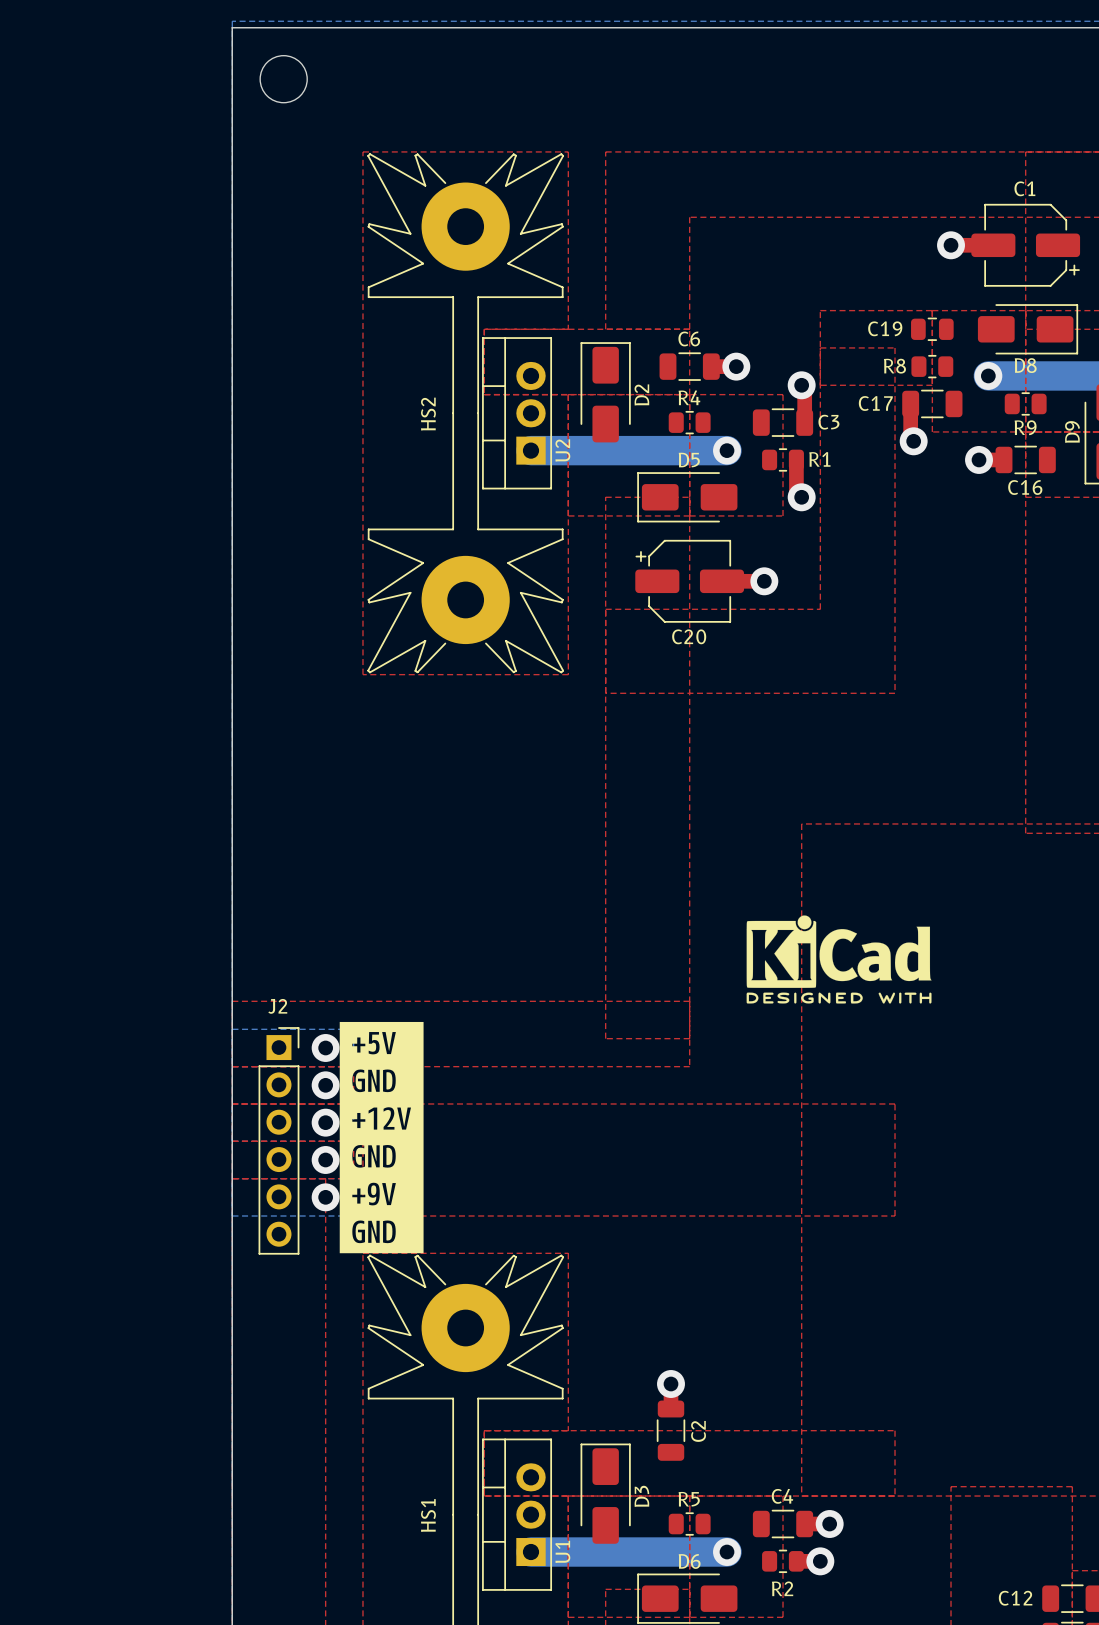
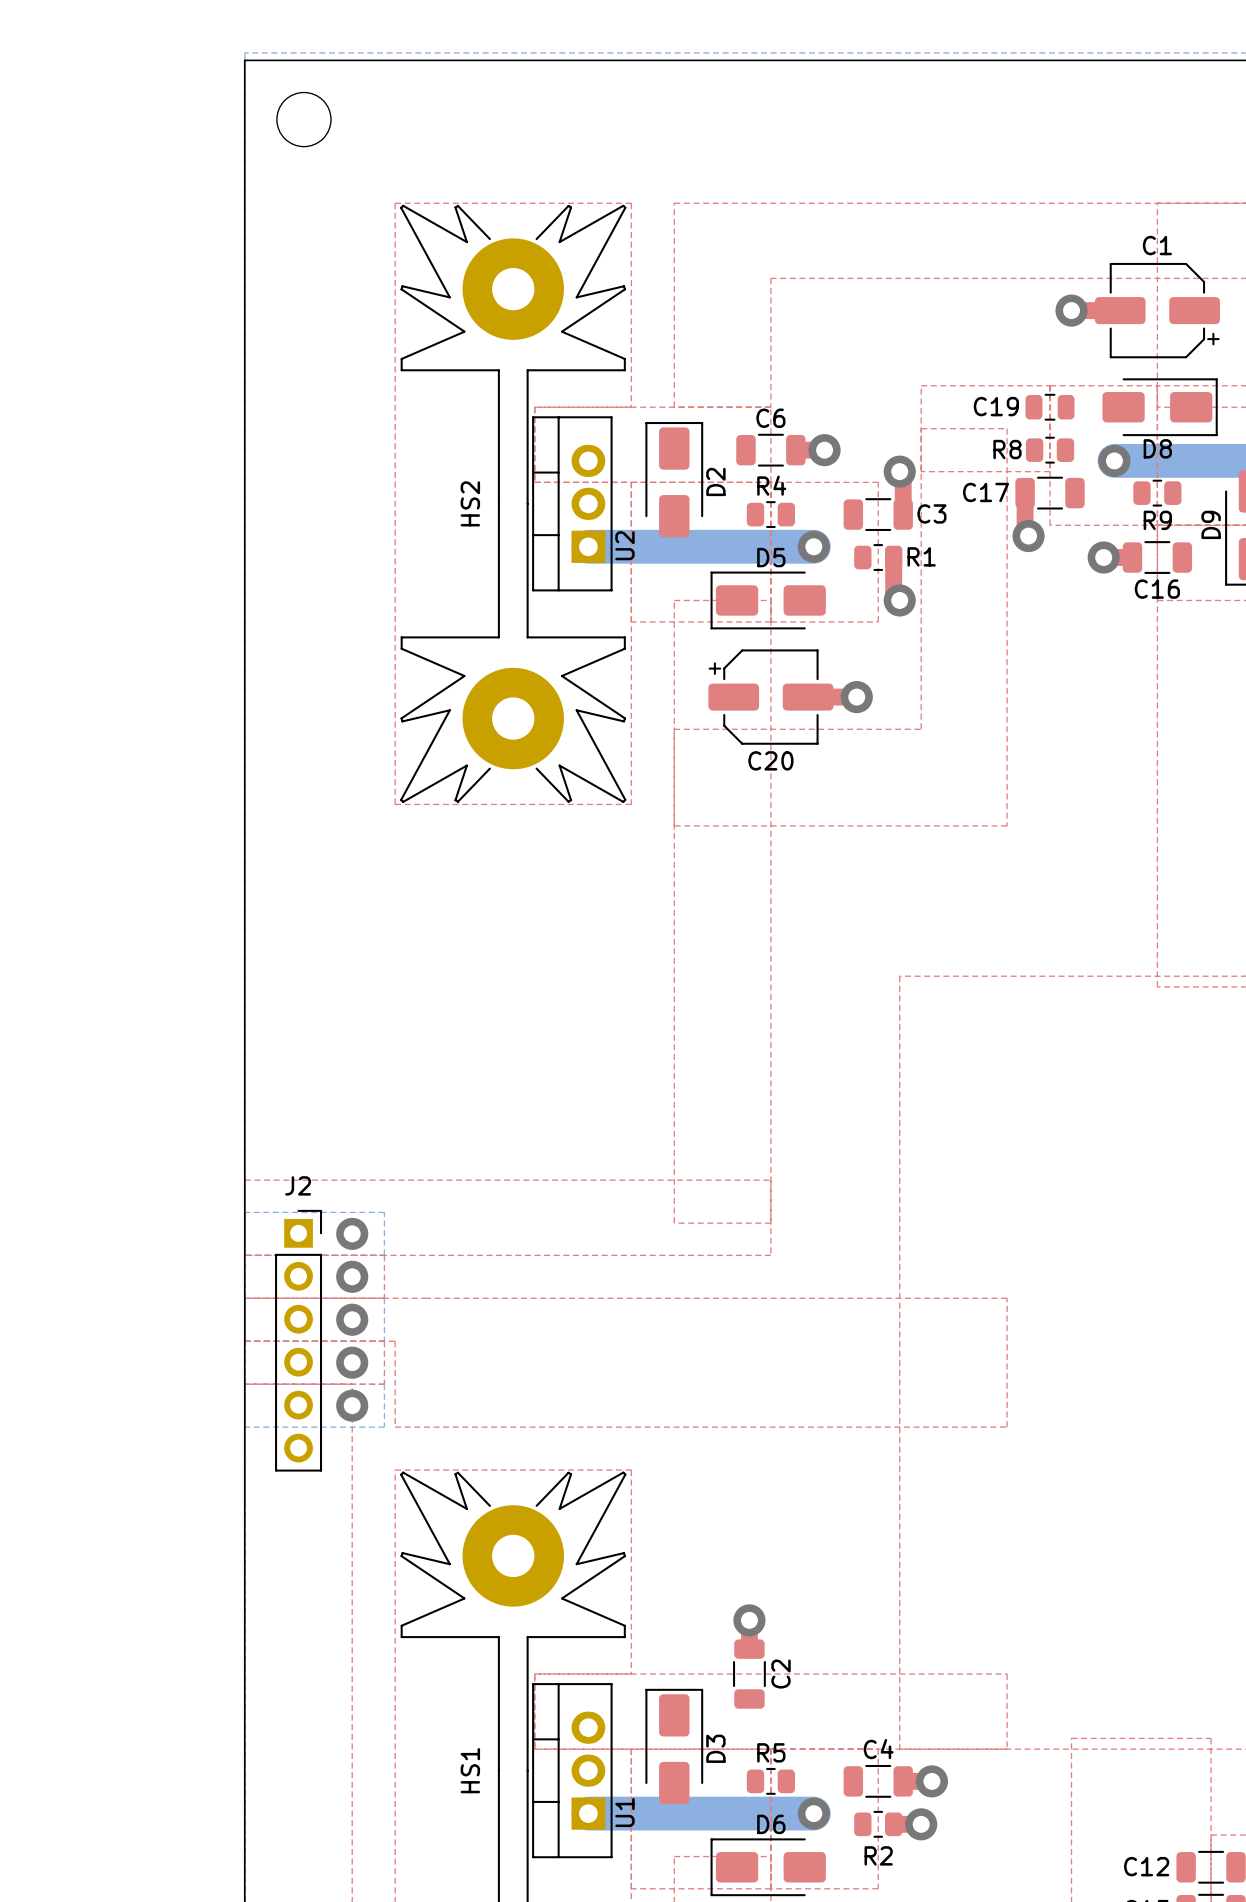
drawing: [746, 915, 932, 1004] -> none
drawing: [339, 1021, 424, 1254] -> none

